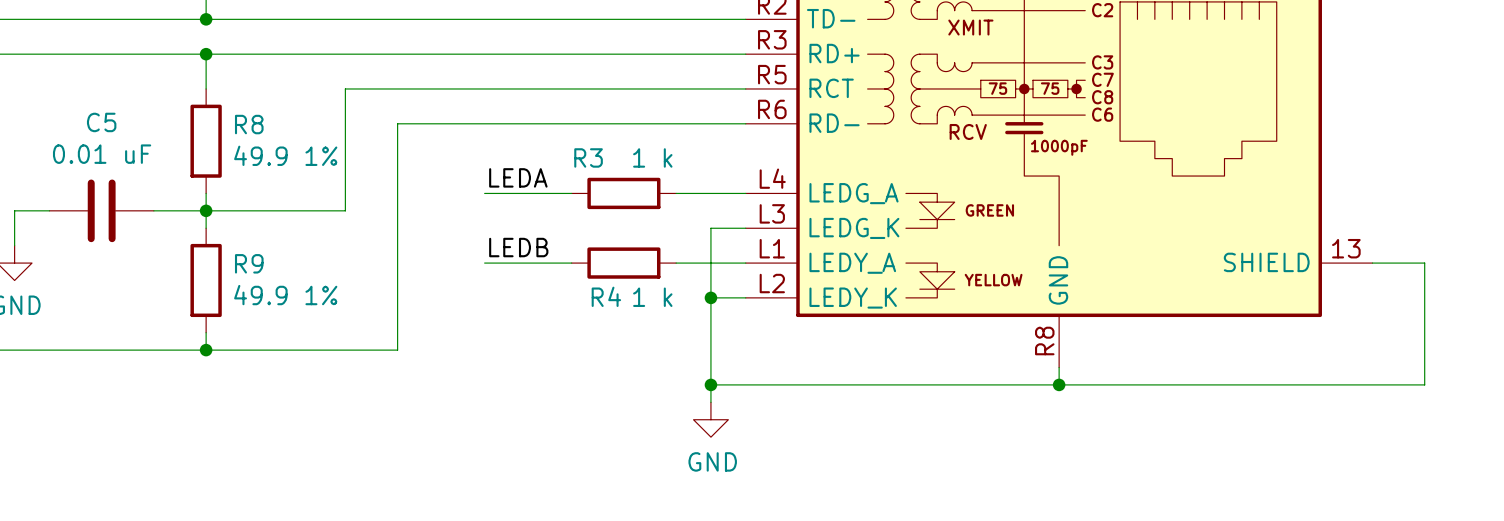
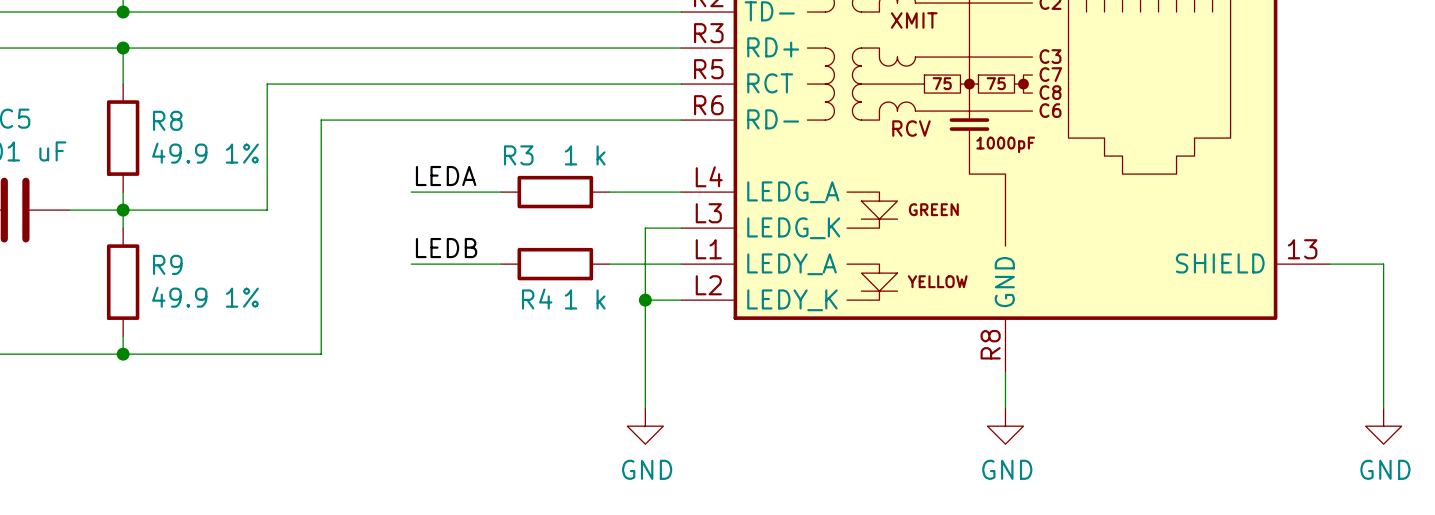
wire: (710, 384) (1424, 384) -> (1383, 408) (1383, 390)
junction: (710, 384) -> none
wire: none -> (1005, 390) (1005, 408)
junction: (1059, 384) -> none
power symbol: none -> GND (1005, 426)
power symbol: none -> GND (1383, 426)

